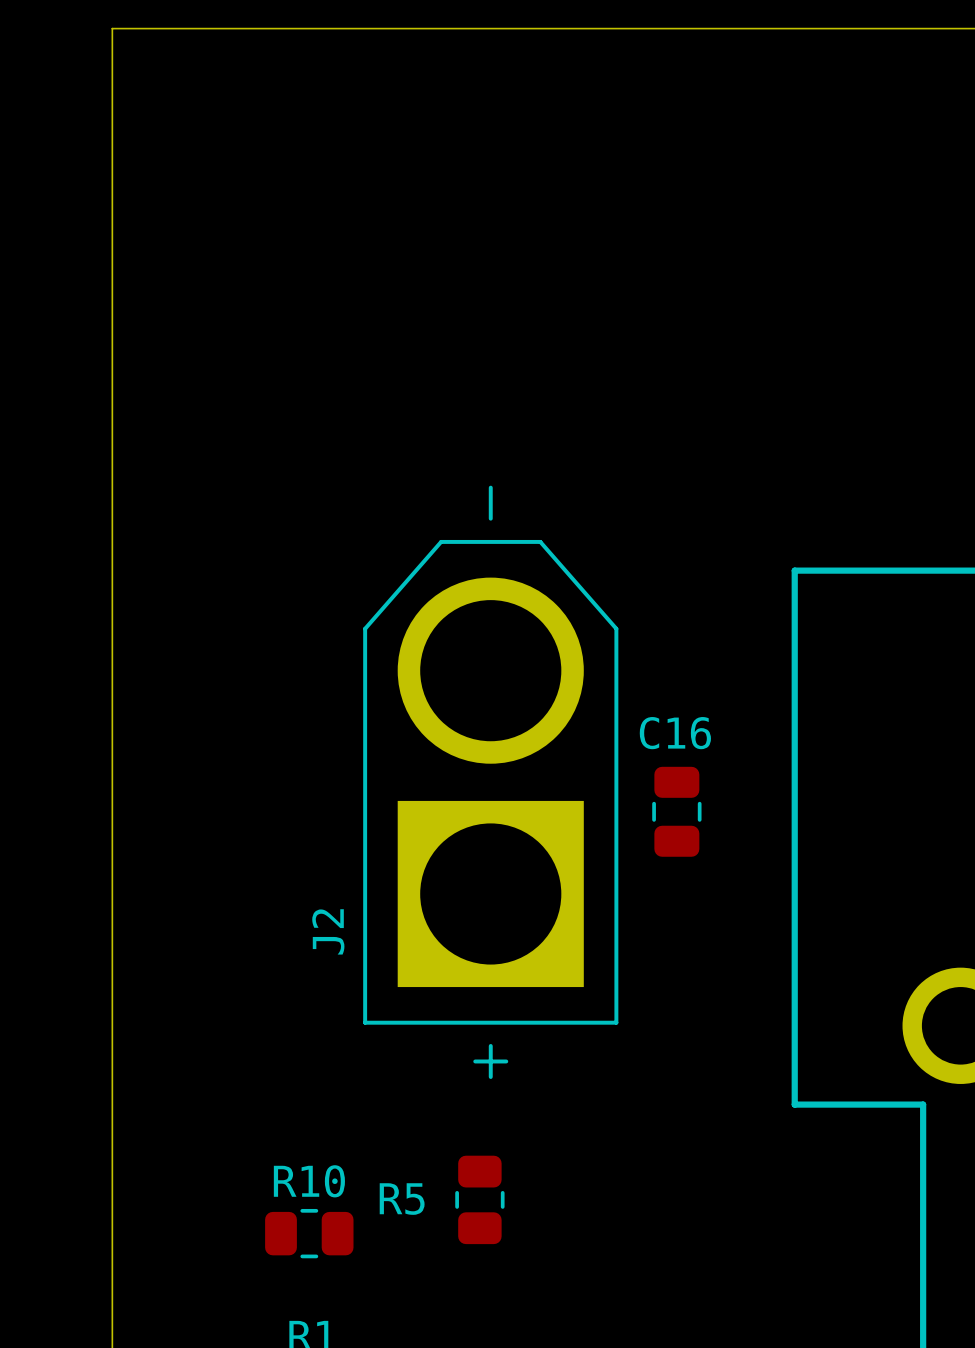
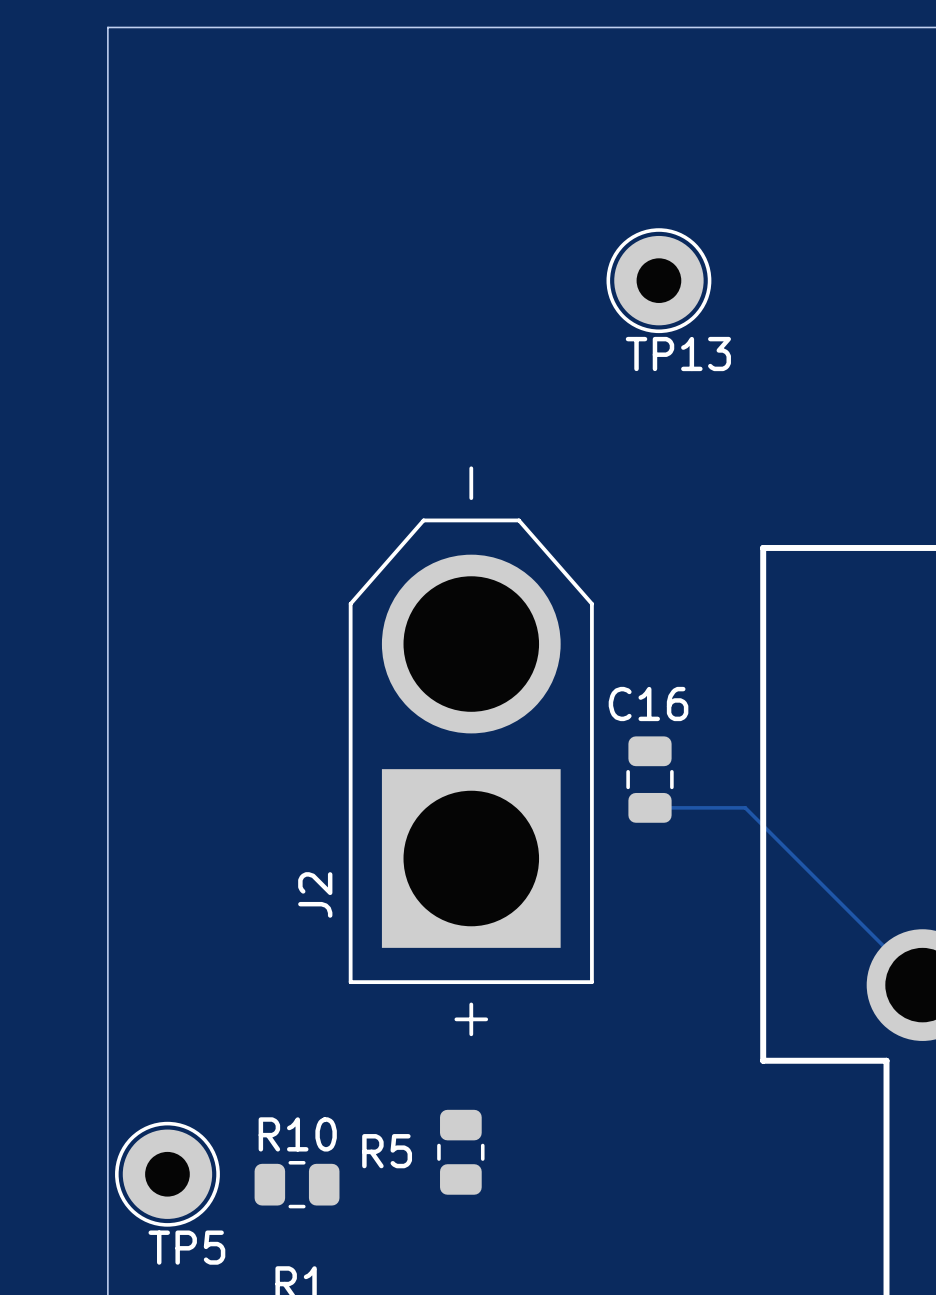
TP13: none -> (658, 280)
track: none -> (650, 807) (745, 807) (922, 985)
TP5: none -> (167, 1174)

